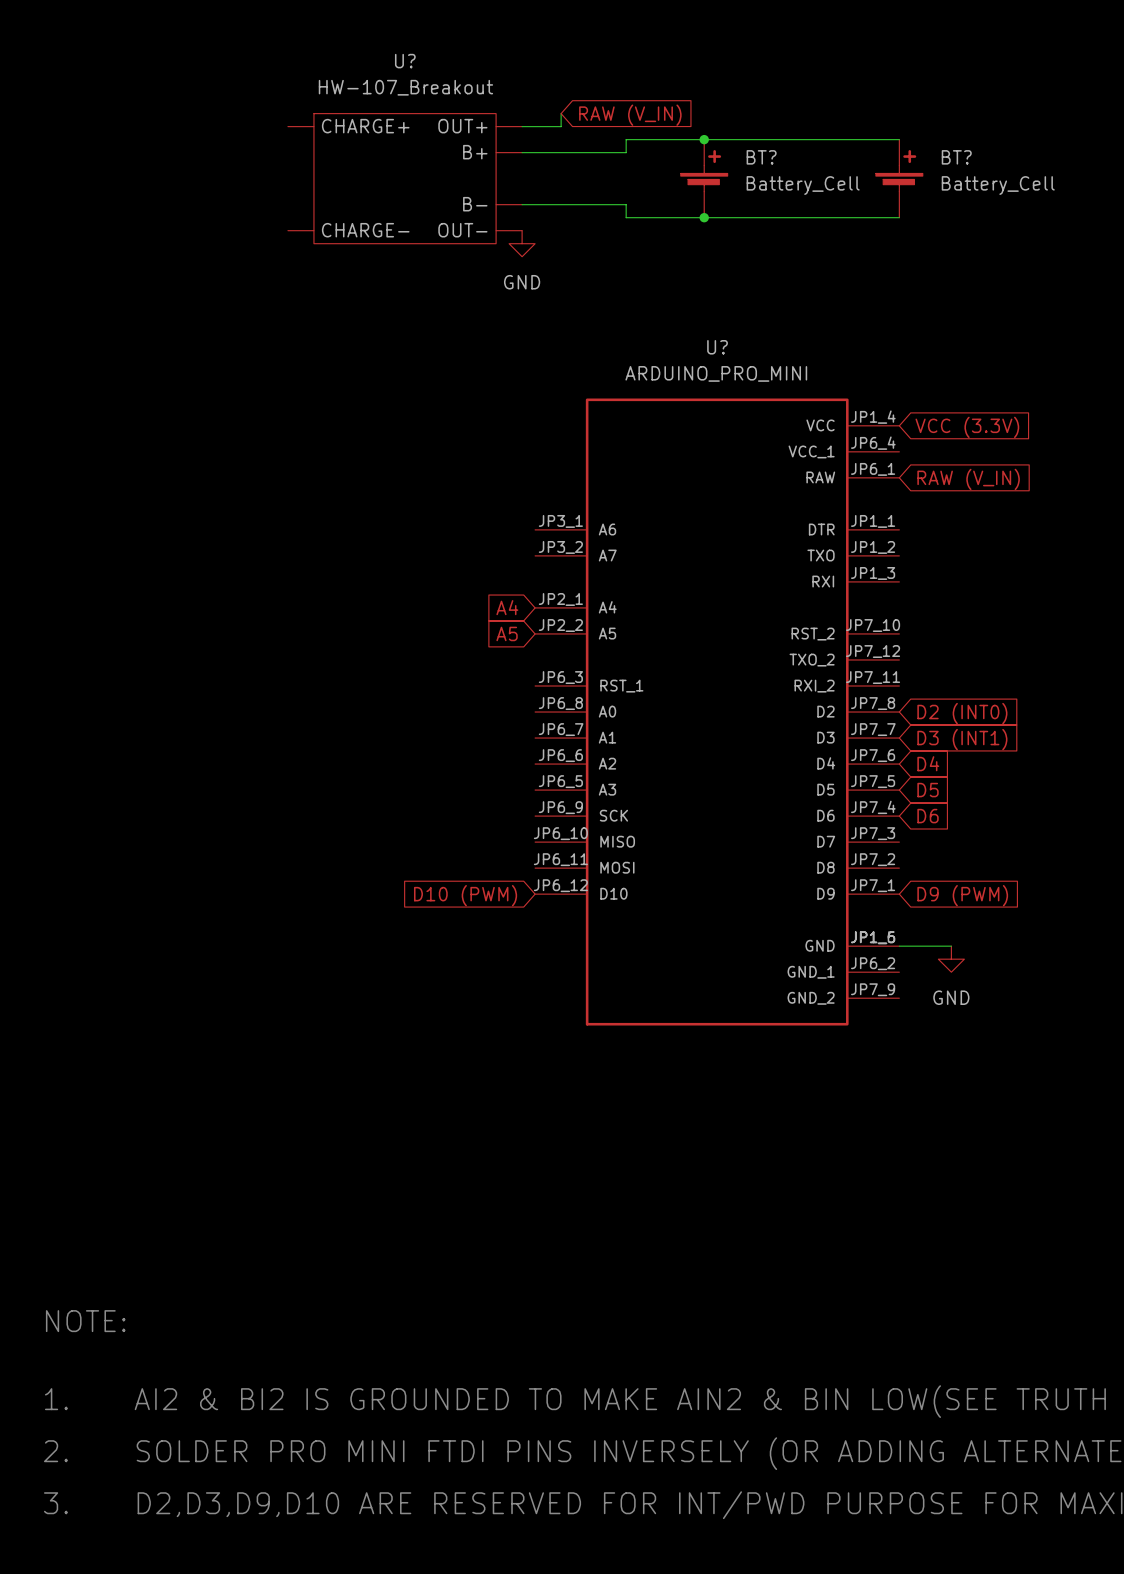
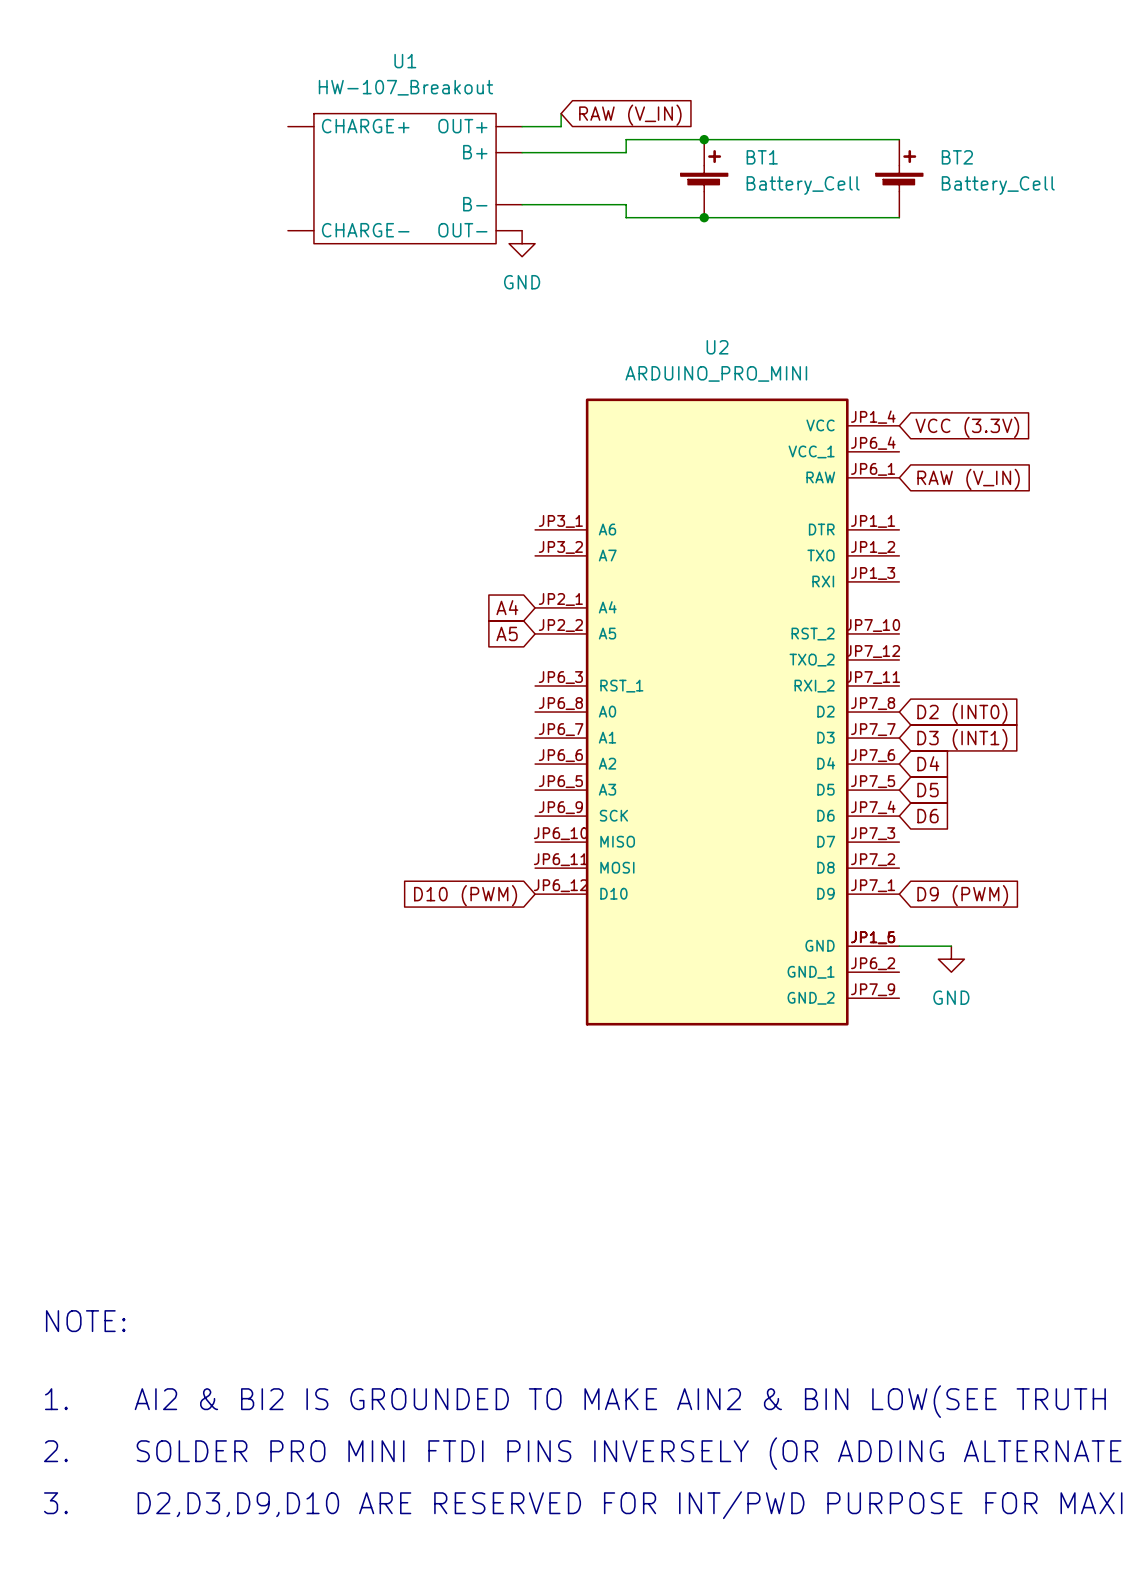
U? name: U? (405, 61) -> U1 (405, 61)
BT? name: BT? (761, 157) -> BT1 (762, 157)
BT? name: BT? (956, 157) -> BT2 (957, 157)
U? name: U? (717, 347) -> U2 (717, 347)

